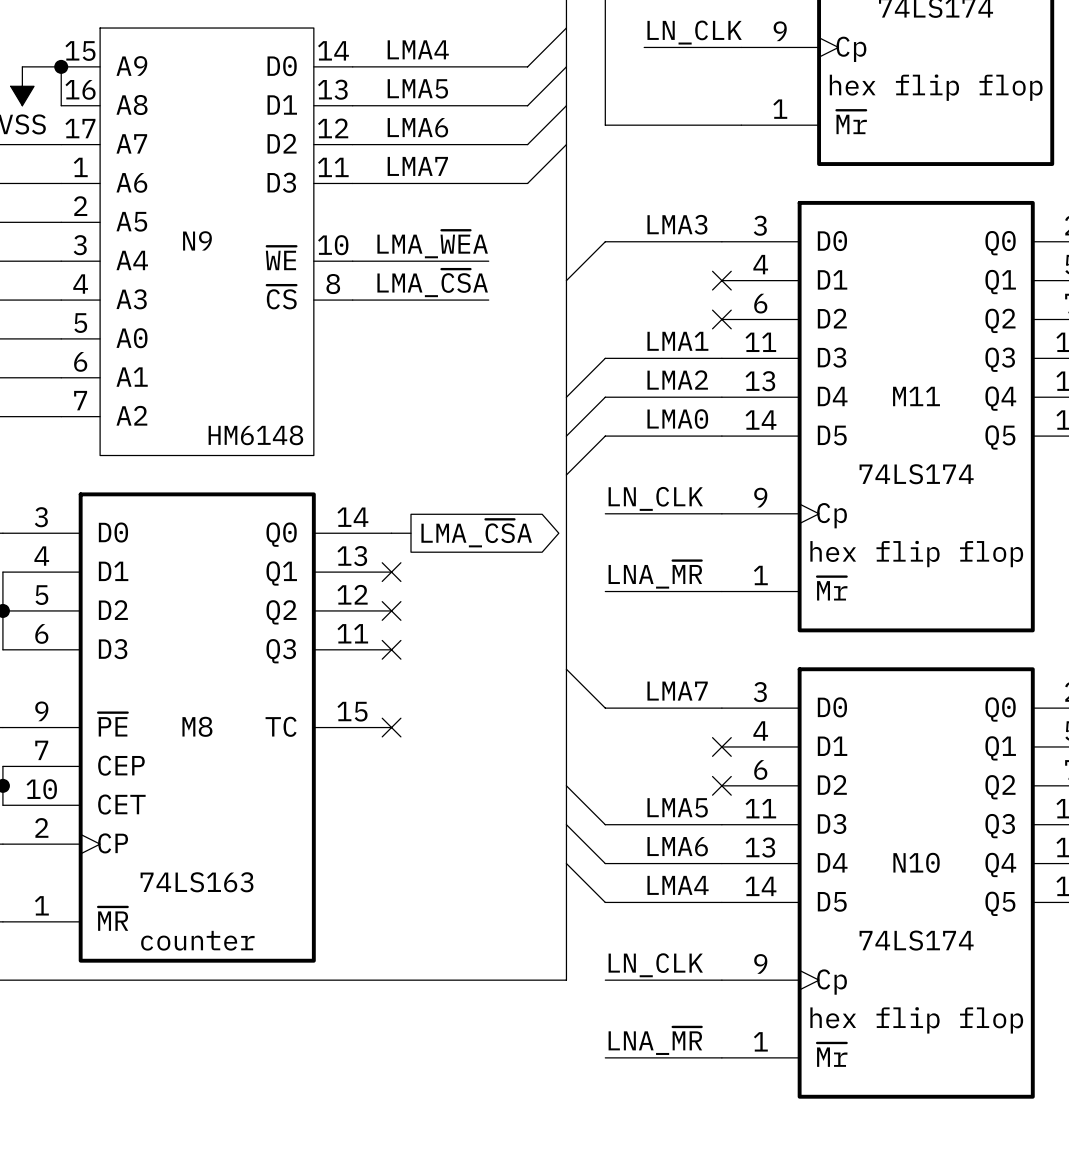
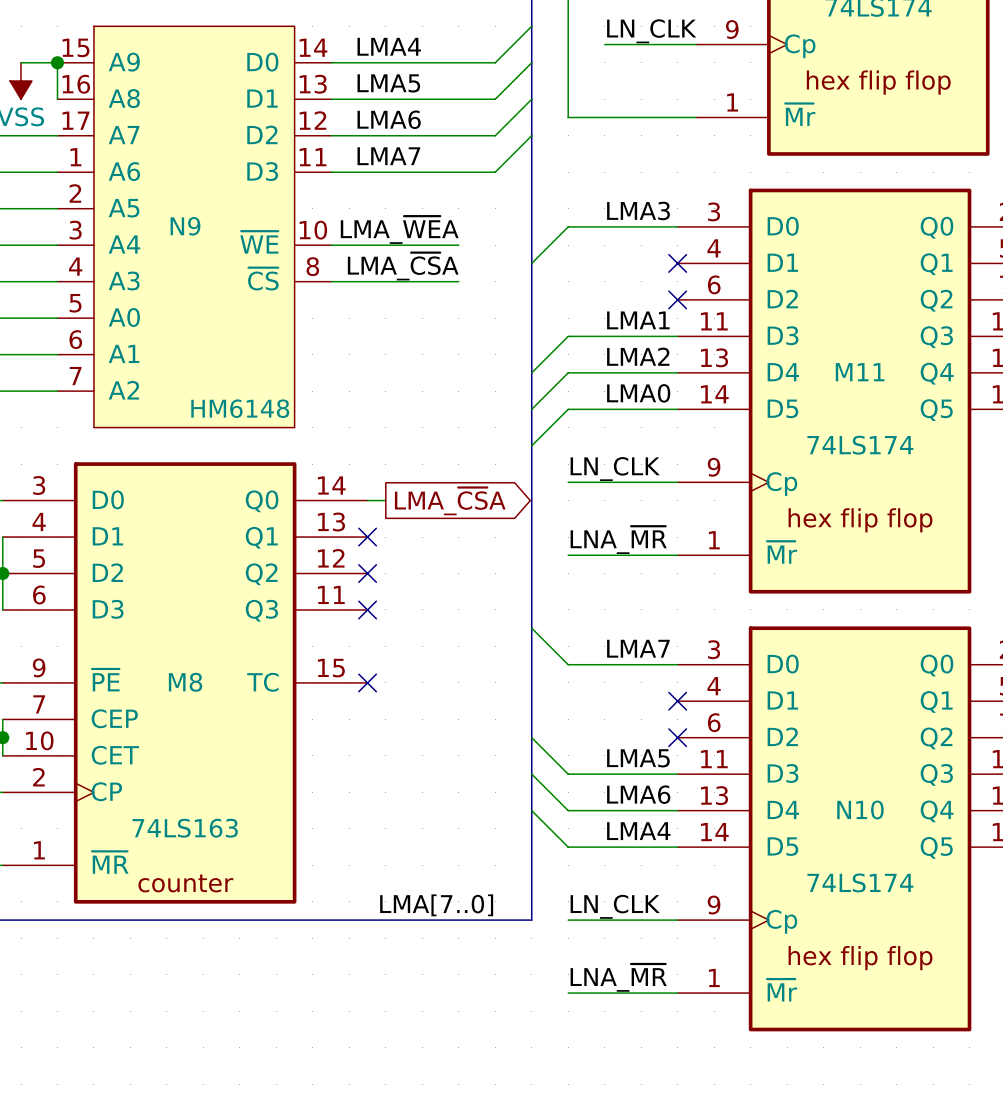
label: none -> LMA[7..0] (436, 905)

